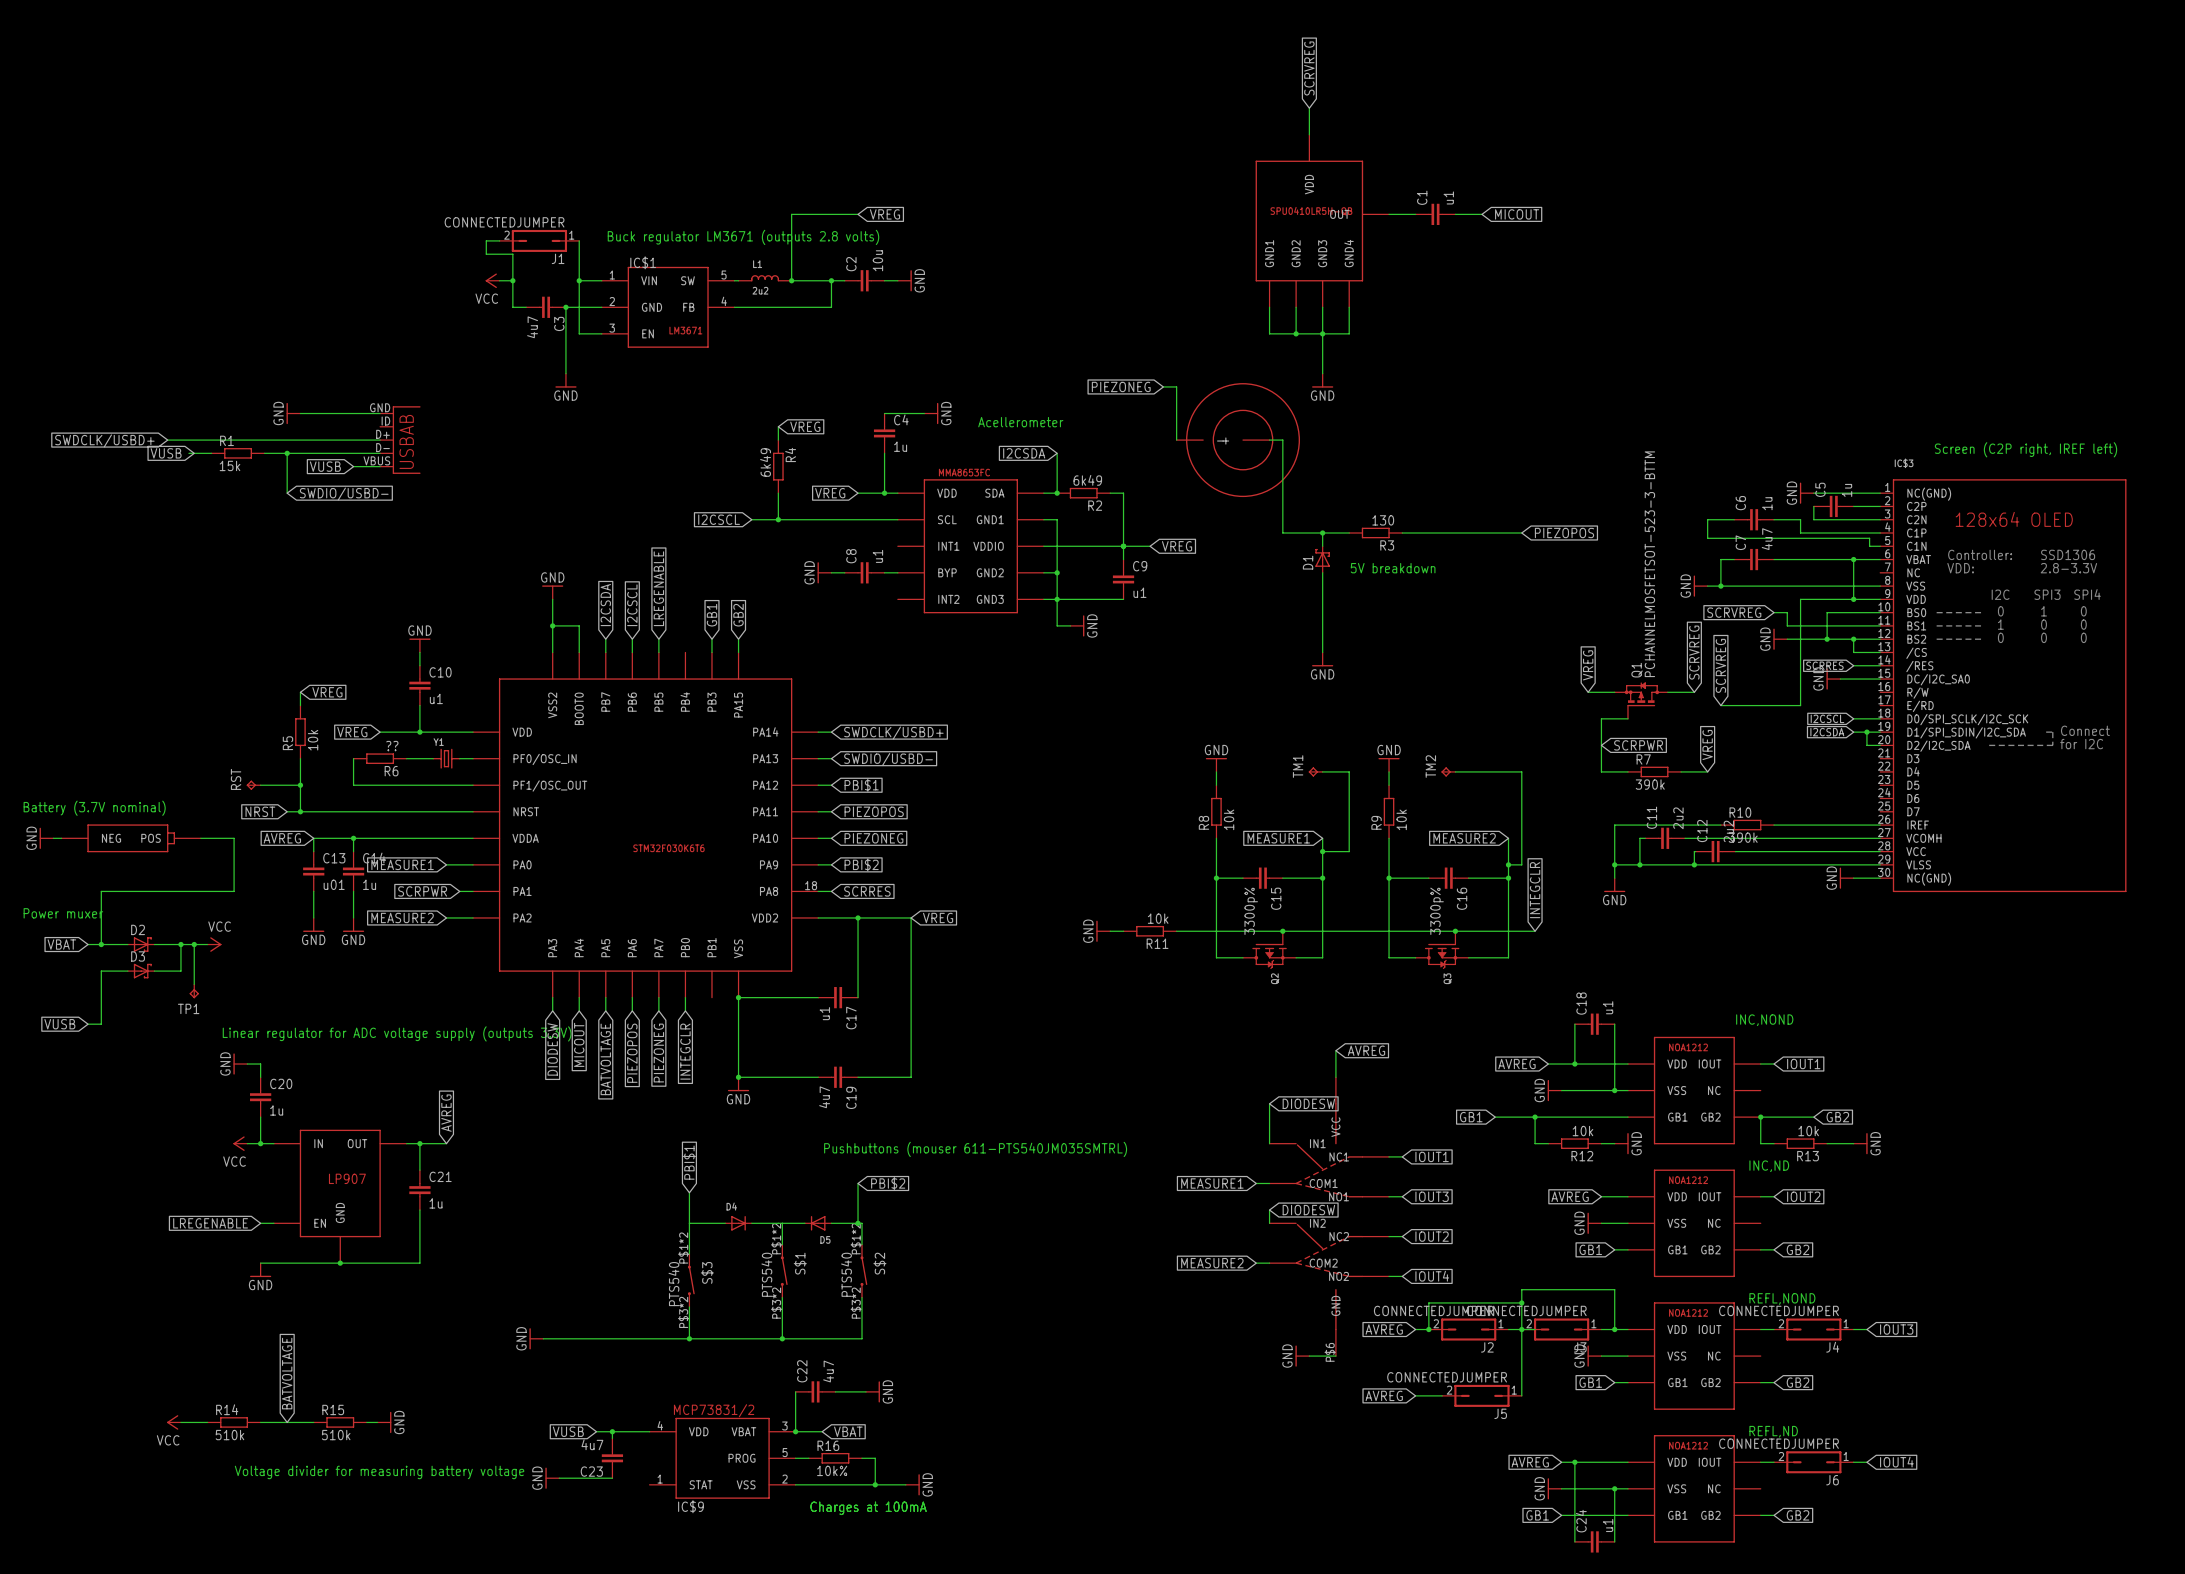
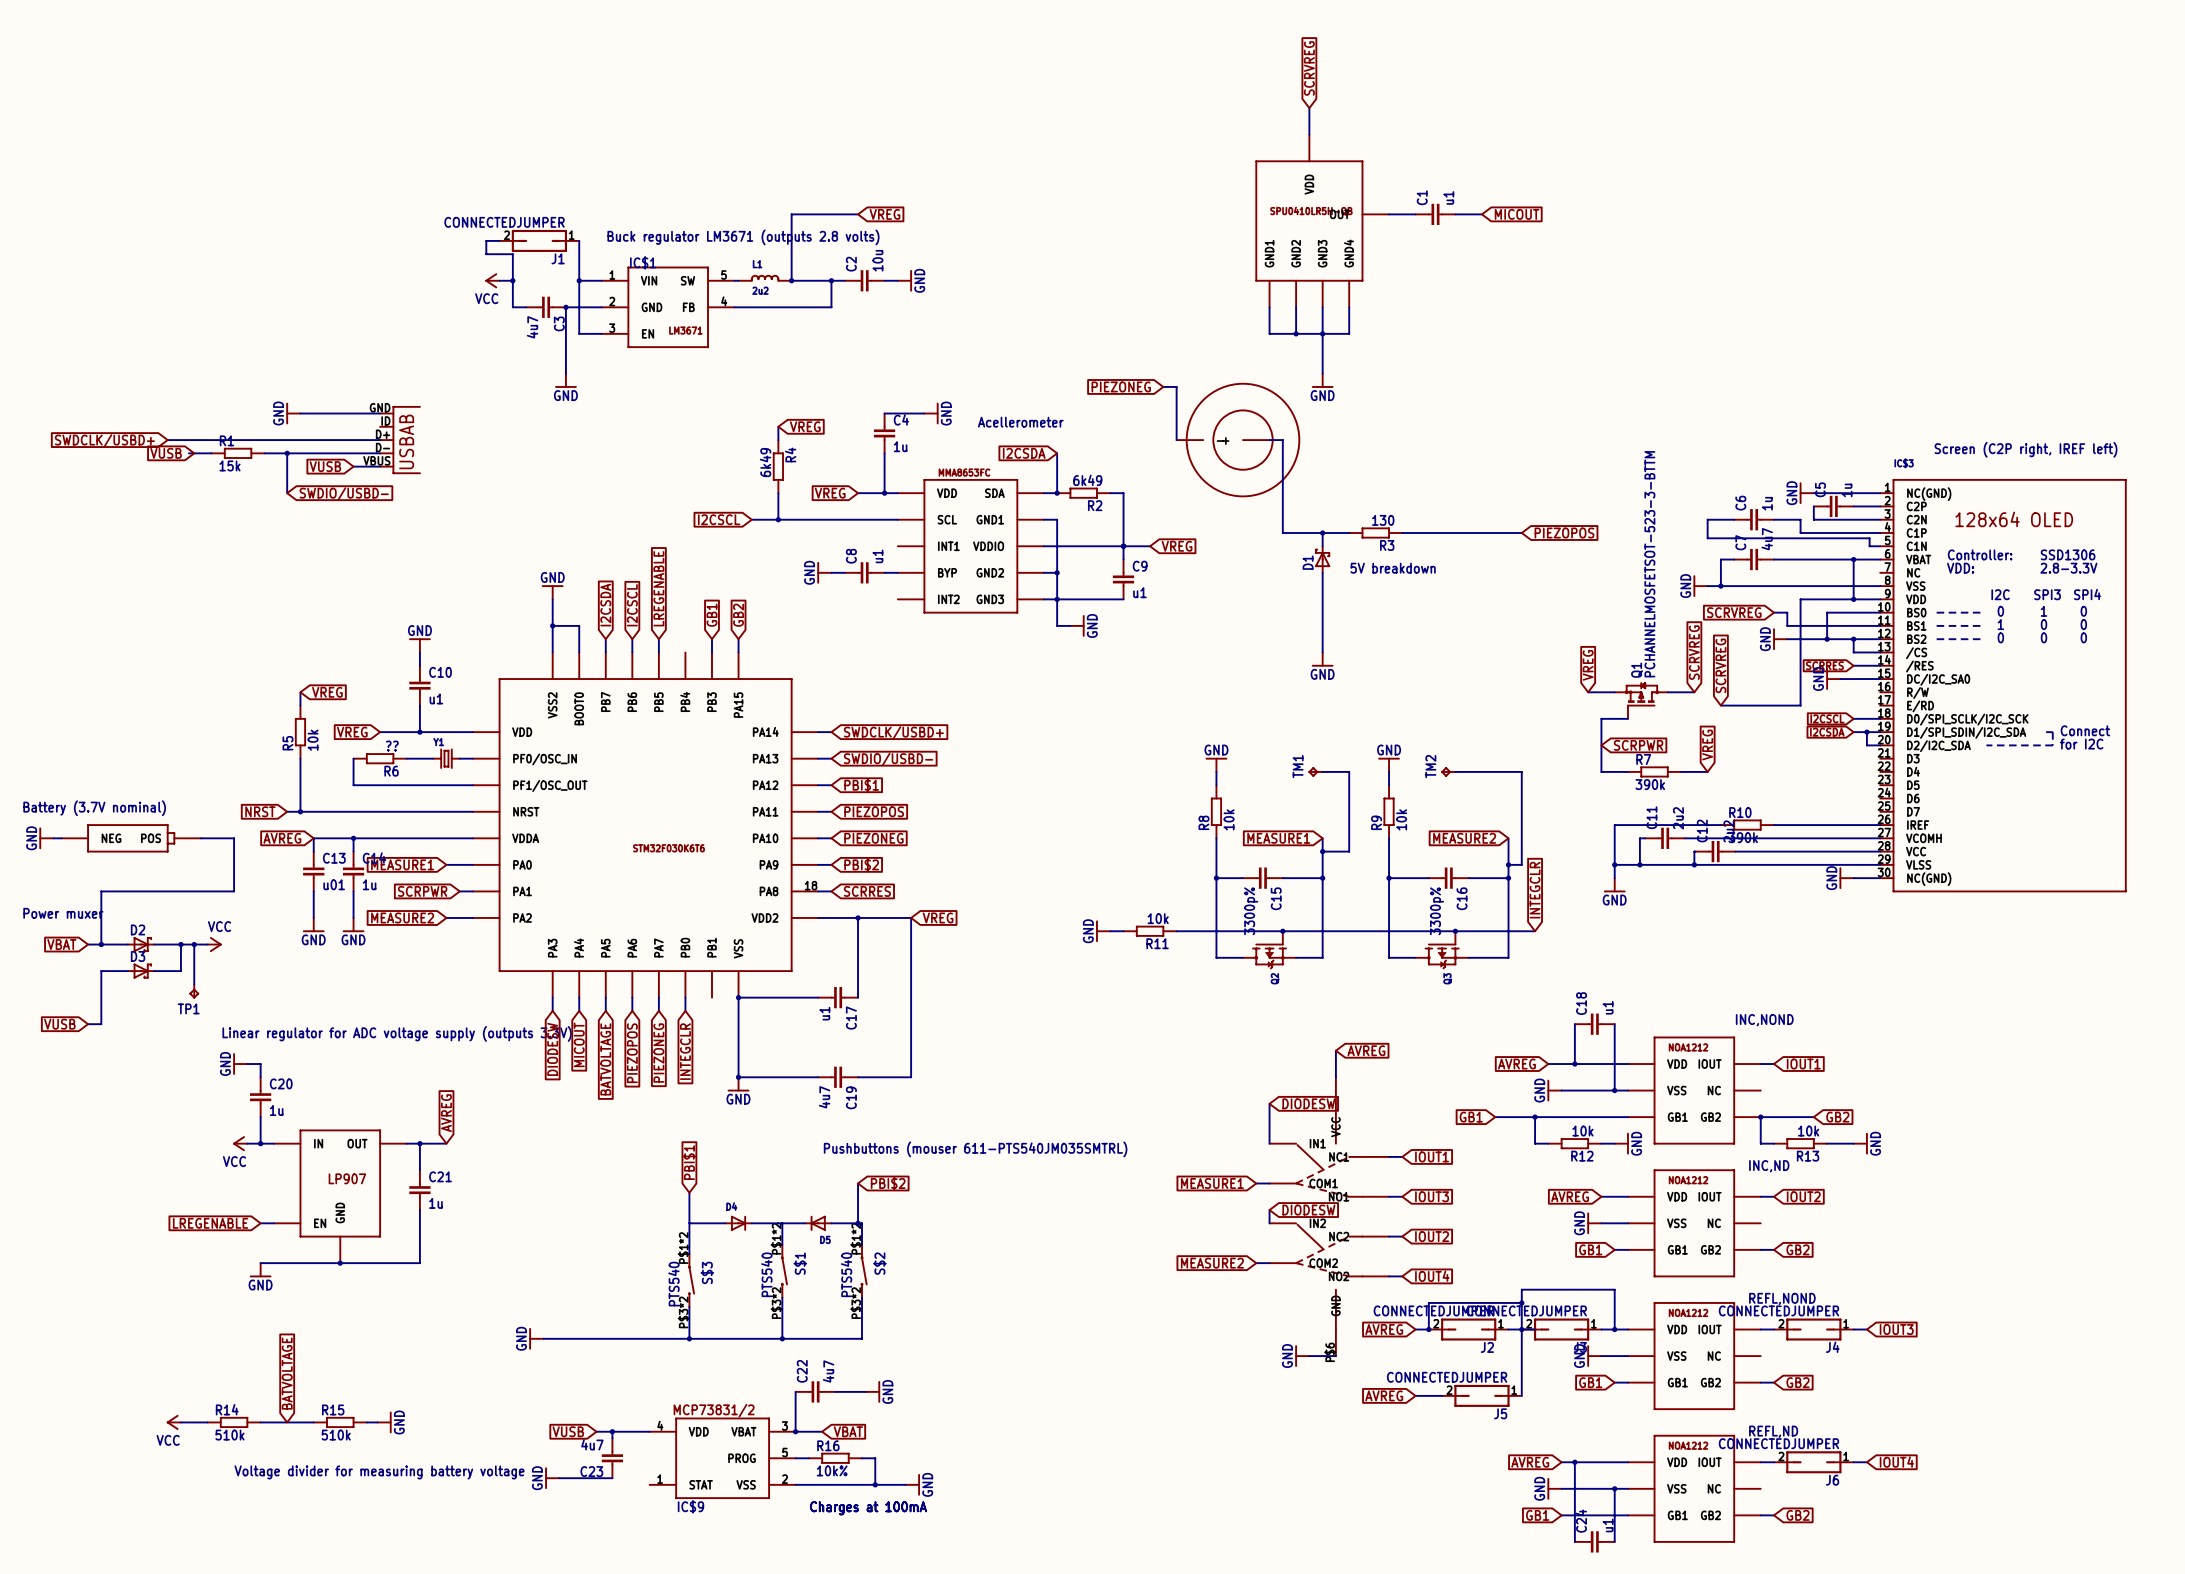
RST: (253, 785) -> none
wire: (260, 785) (300, 785) -> none
junction: (300, 785) -> none

